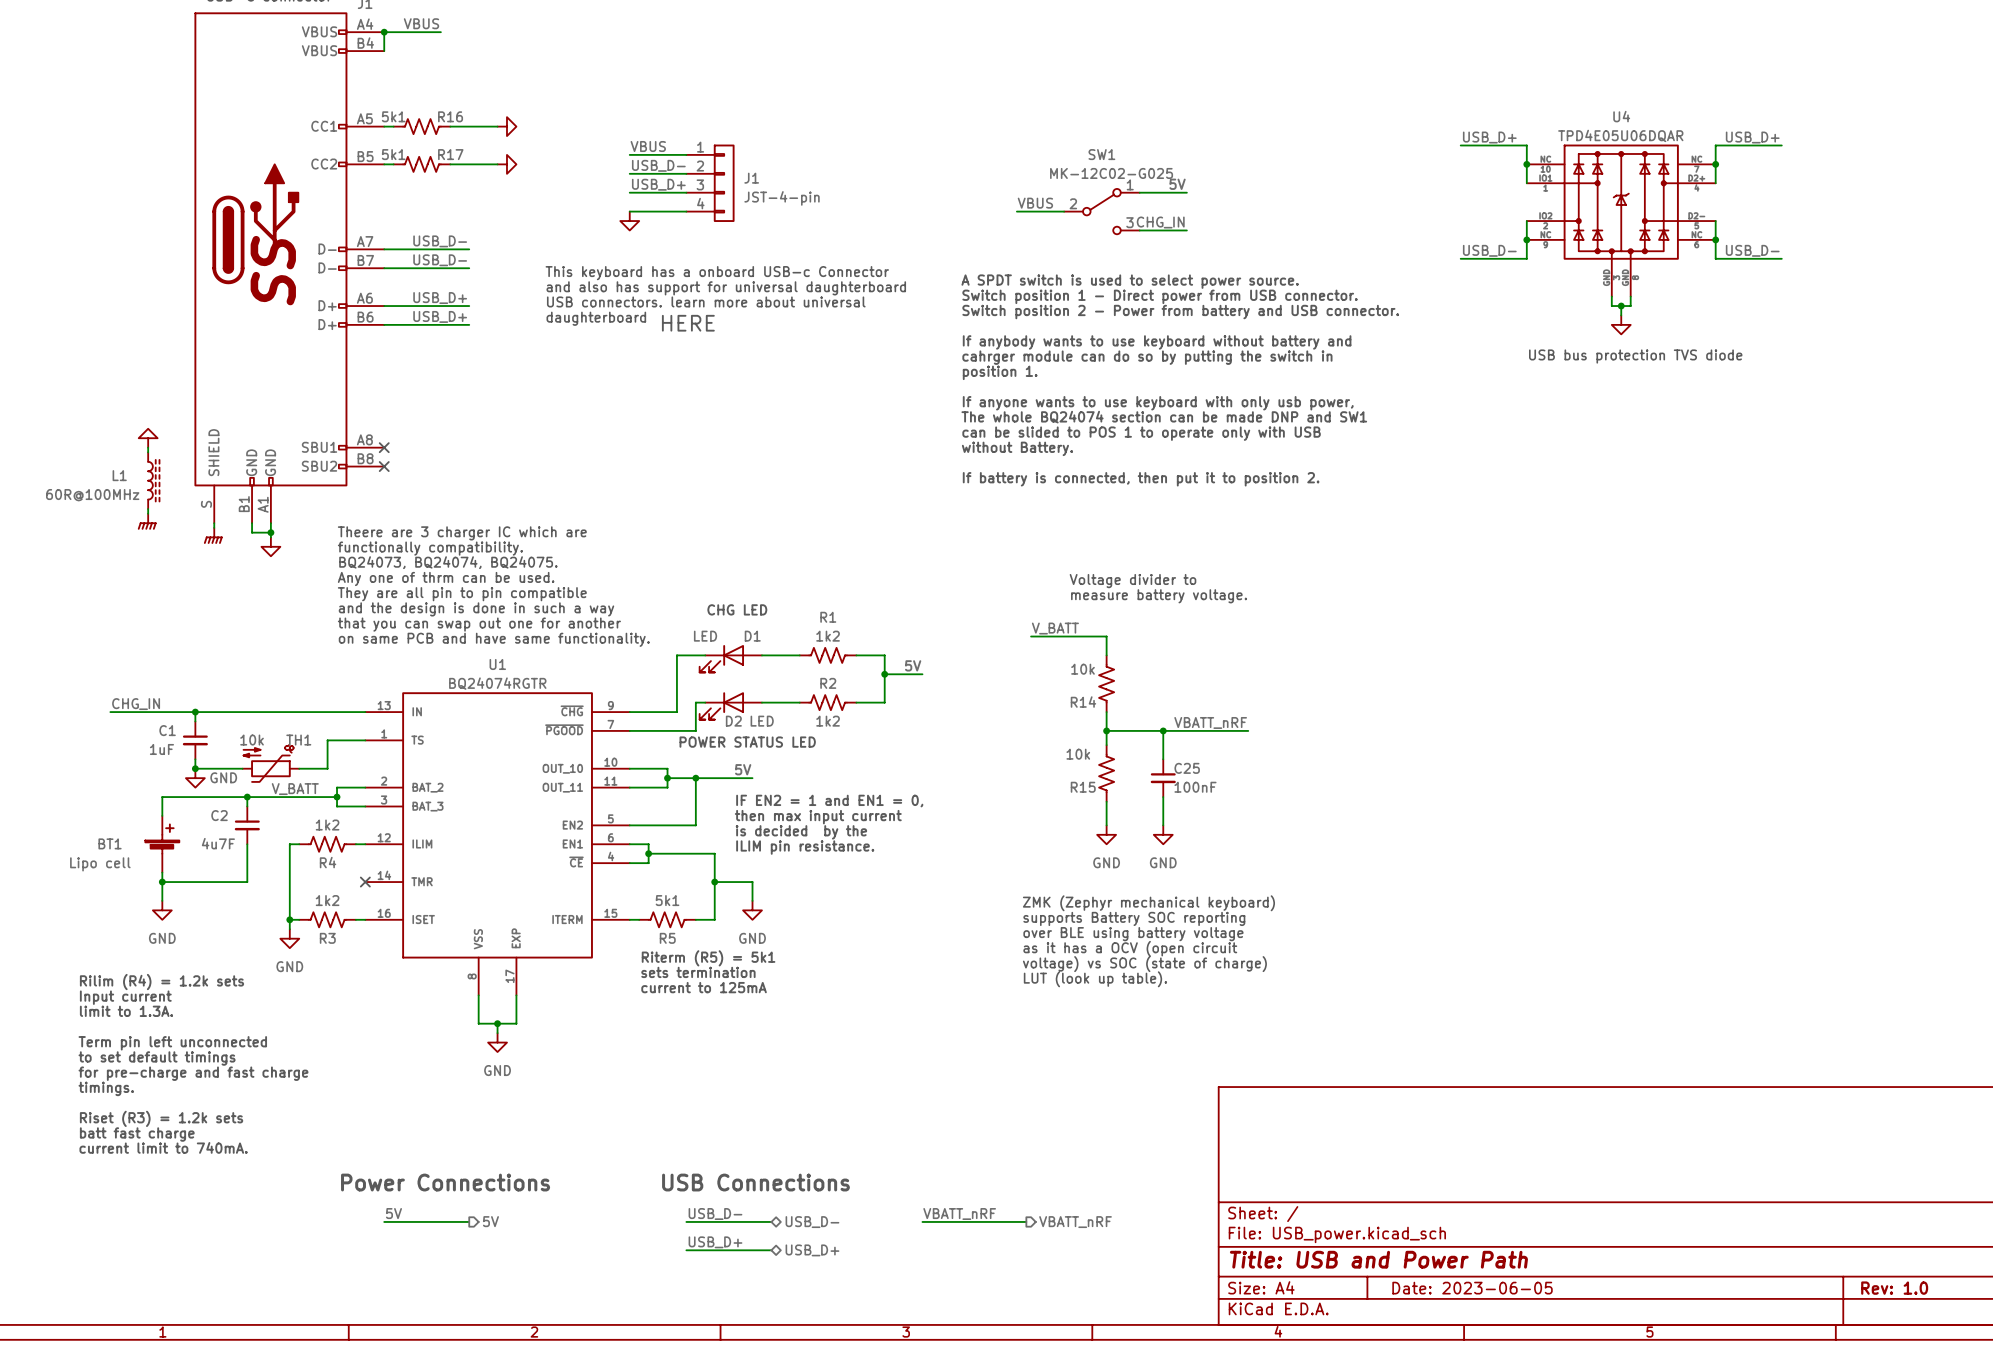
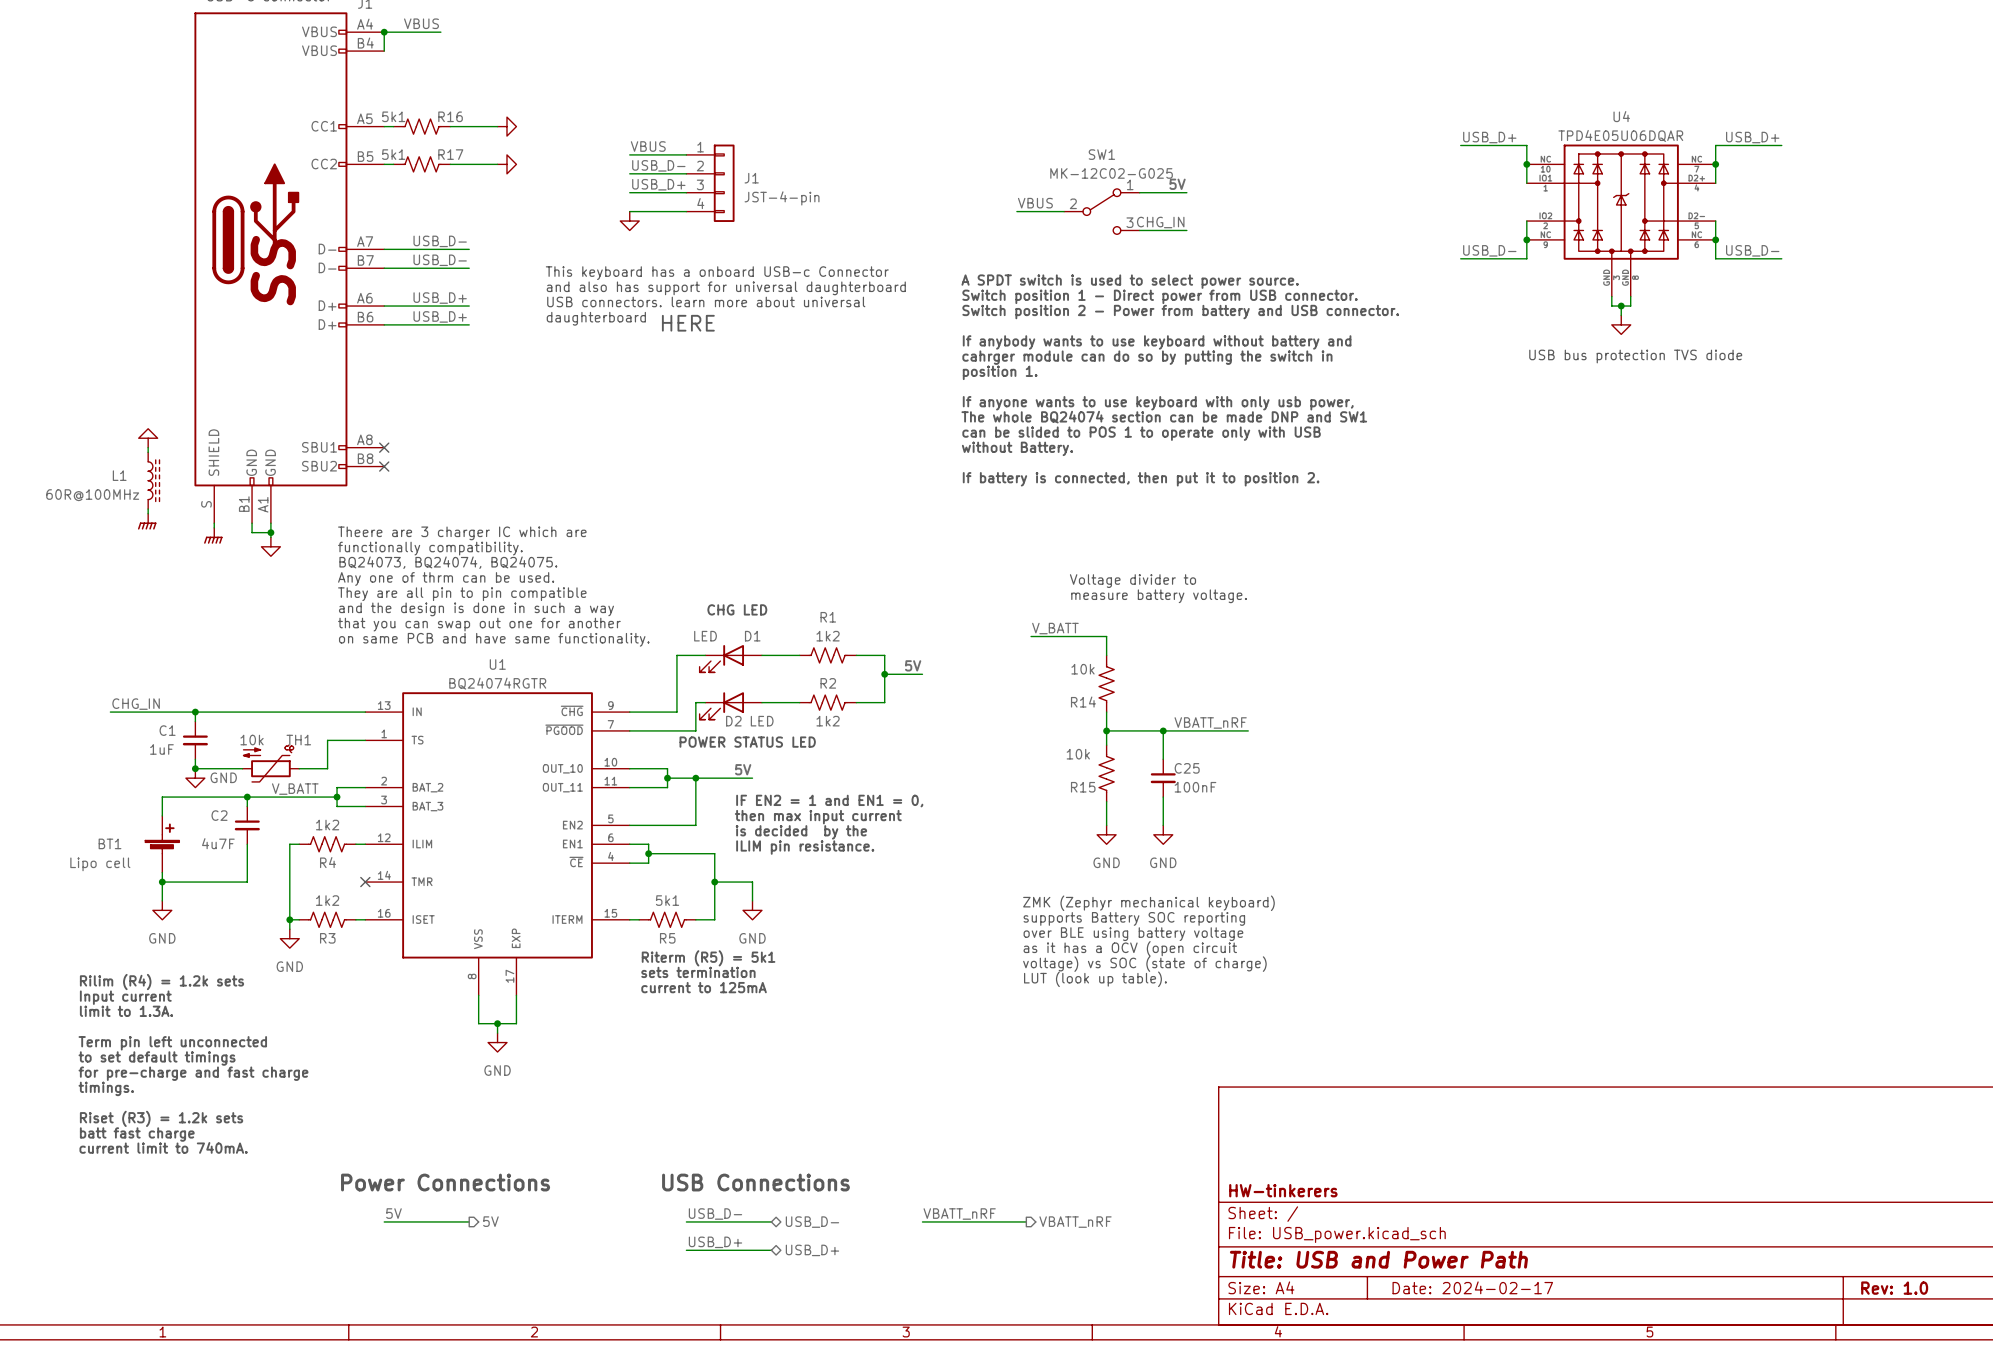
title block: none -> HW-tinkerers (1283, 1190)
title block: Date: 2023-06-05 (1472, 1288) -> Date: 2024-02-17 (1472, 1287)

